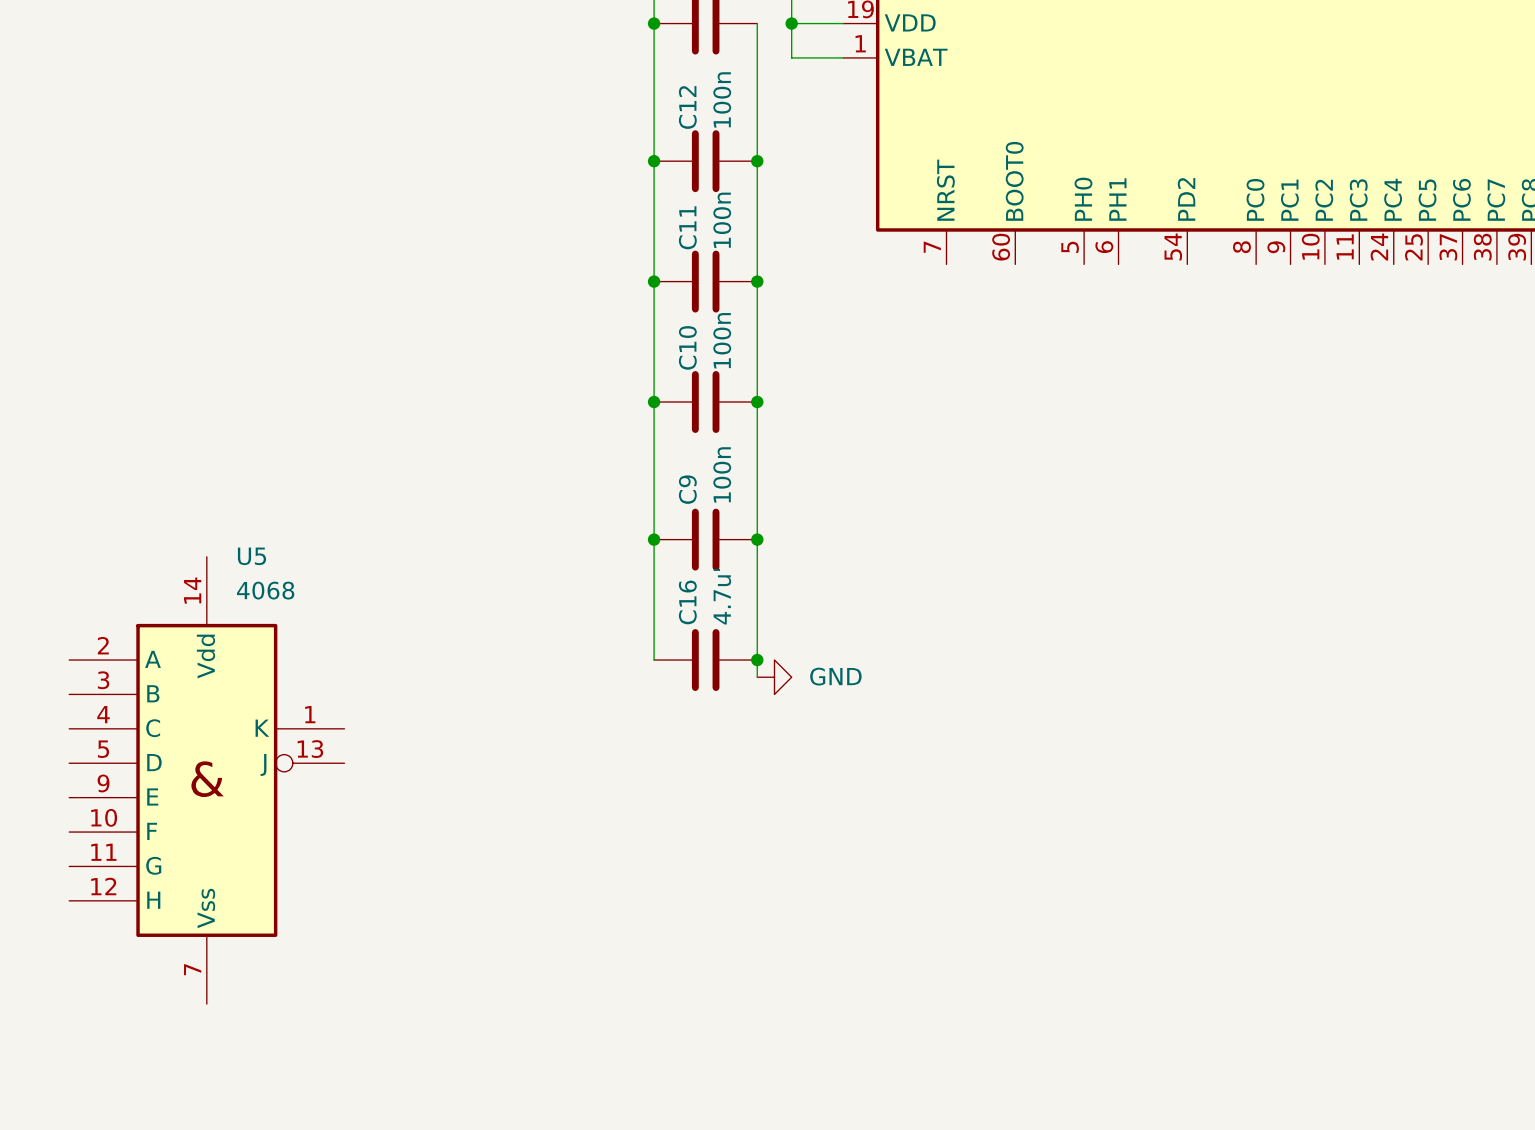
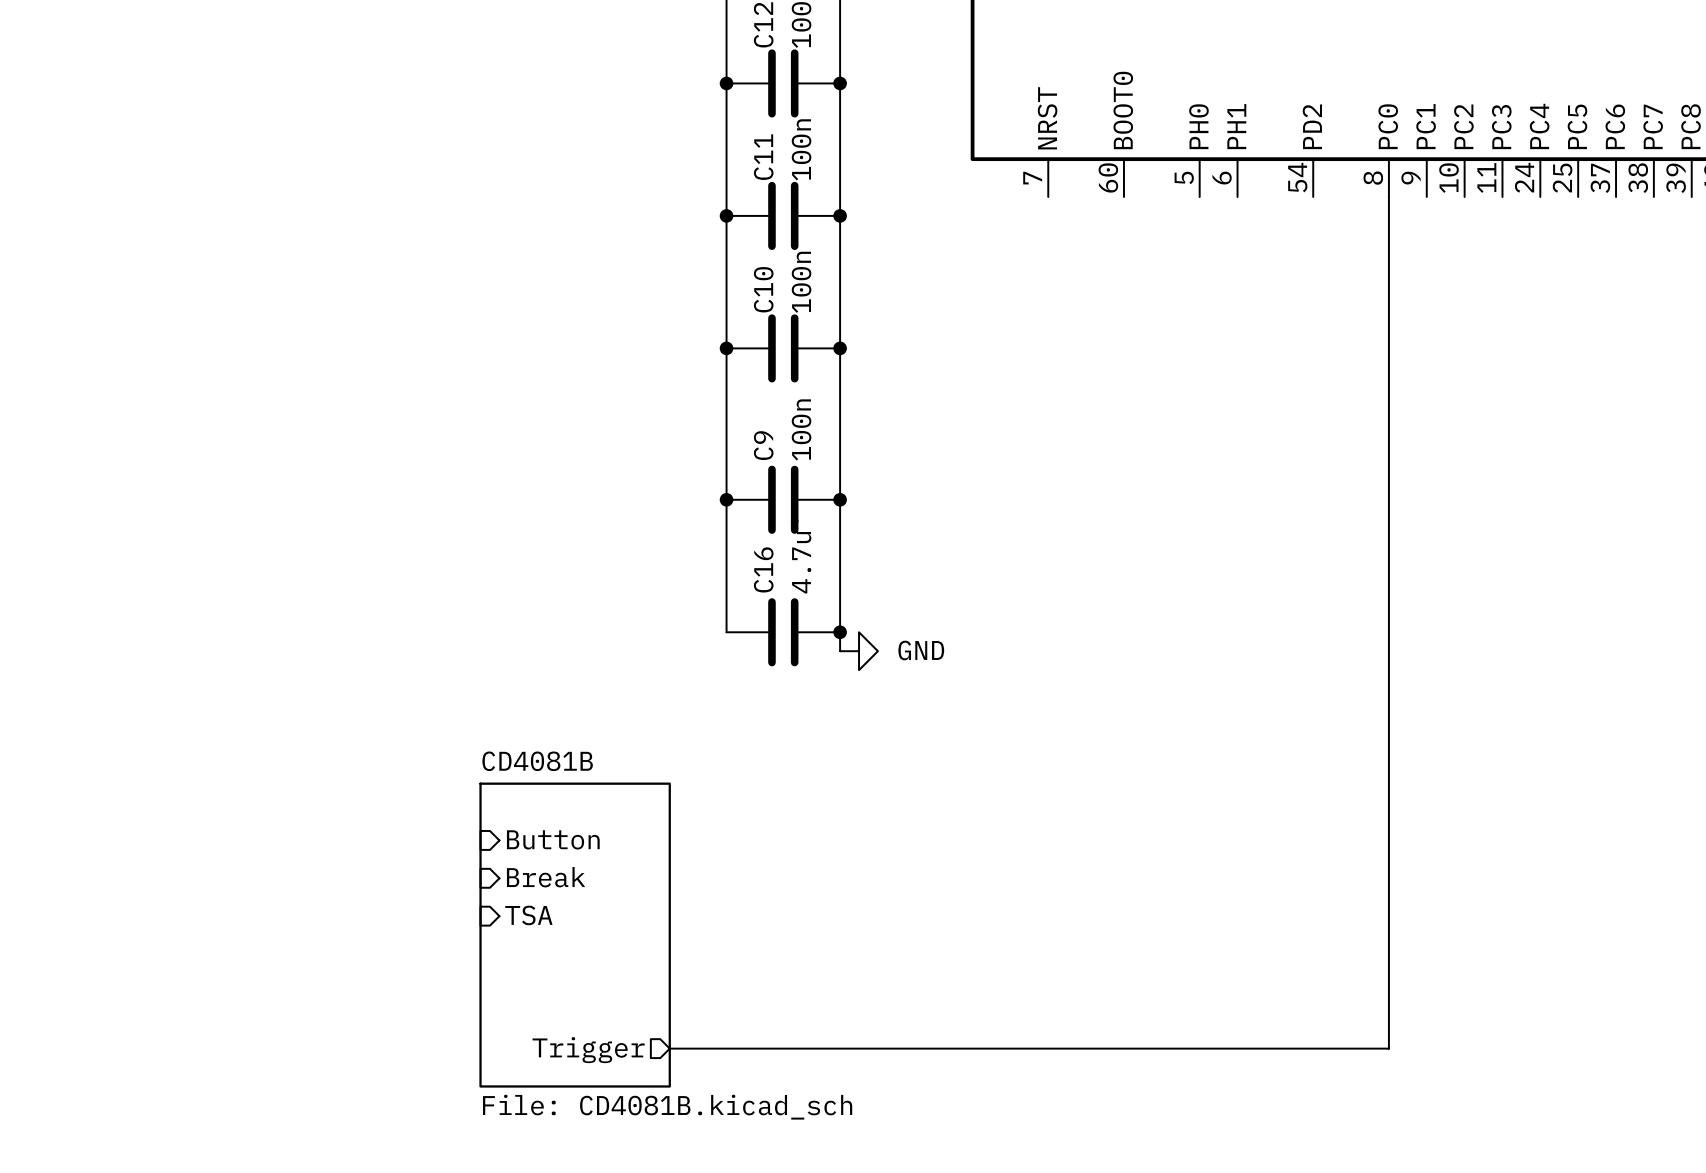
wire: none -> (1388, 196) (1388, 1048) (669, 1048)
U5: 4068 (206, 780) -> none
sheet pin: none -> Button (553, 839)
sheet pin: none -> Break (546, 877)
sheet pin: none -> TSA (528, 915)
sheet CD4081B: none -> File: CD4081B.kicad_sch (575, 935)
sheet pin: none -> Trigger (588, 1050)

